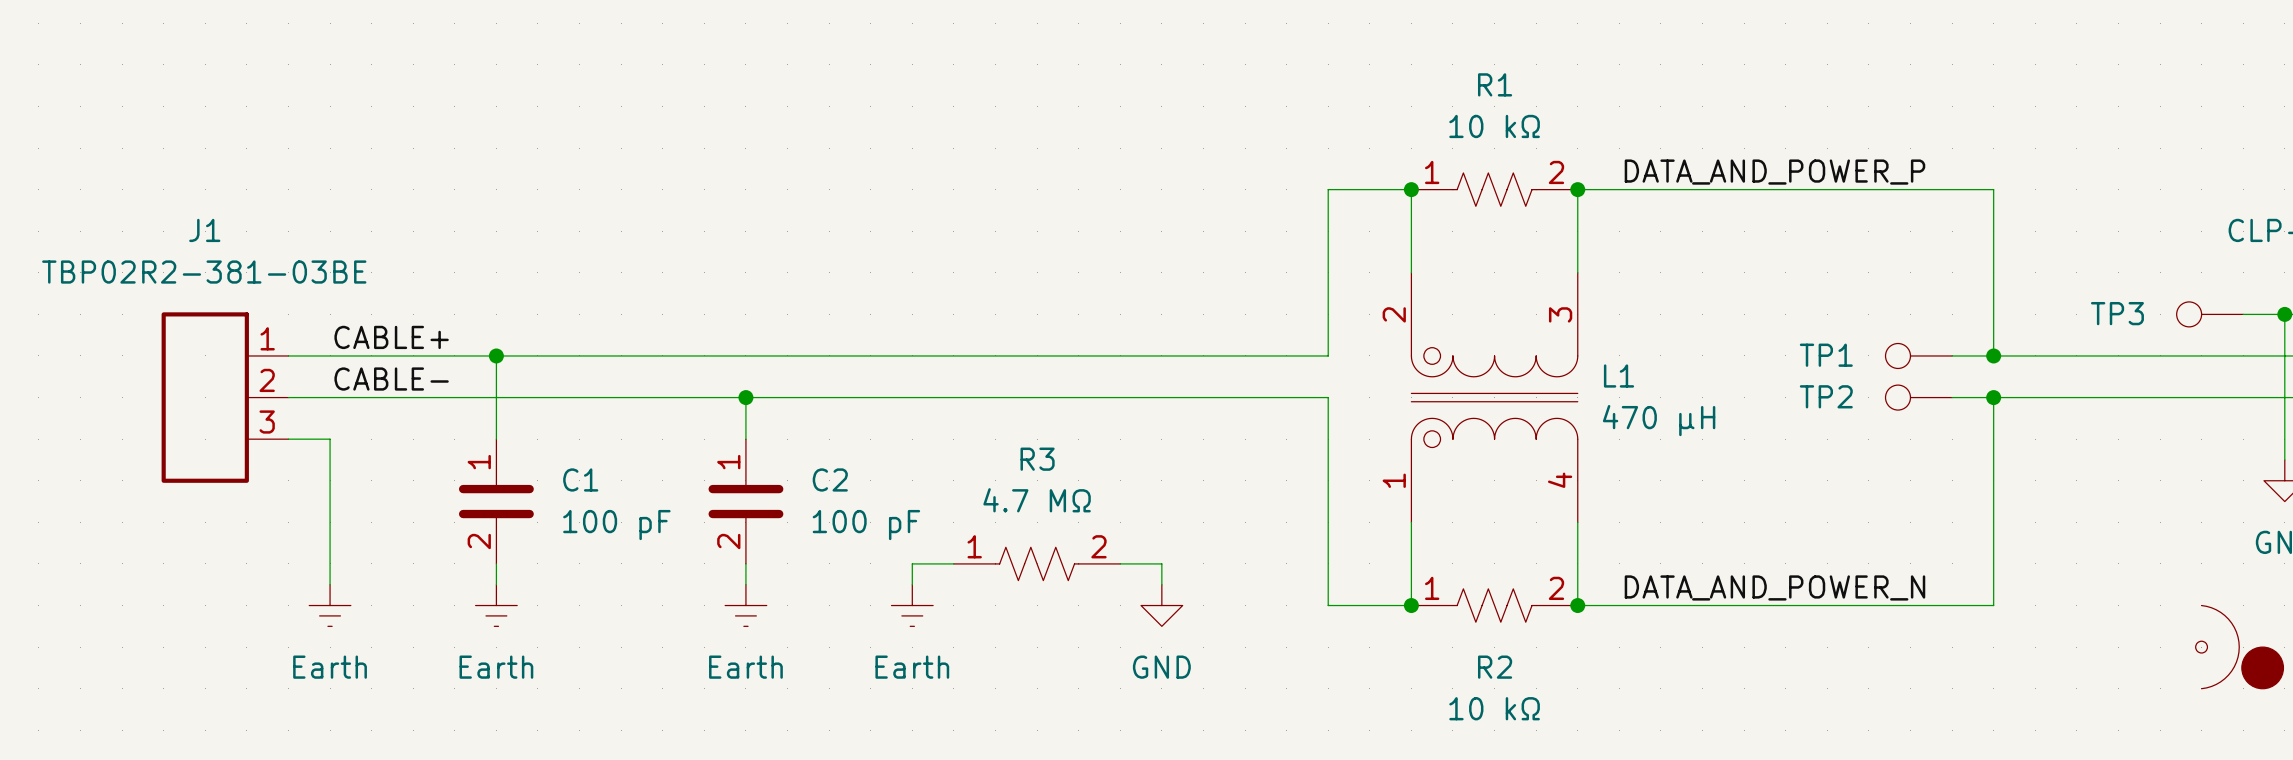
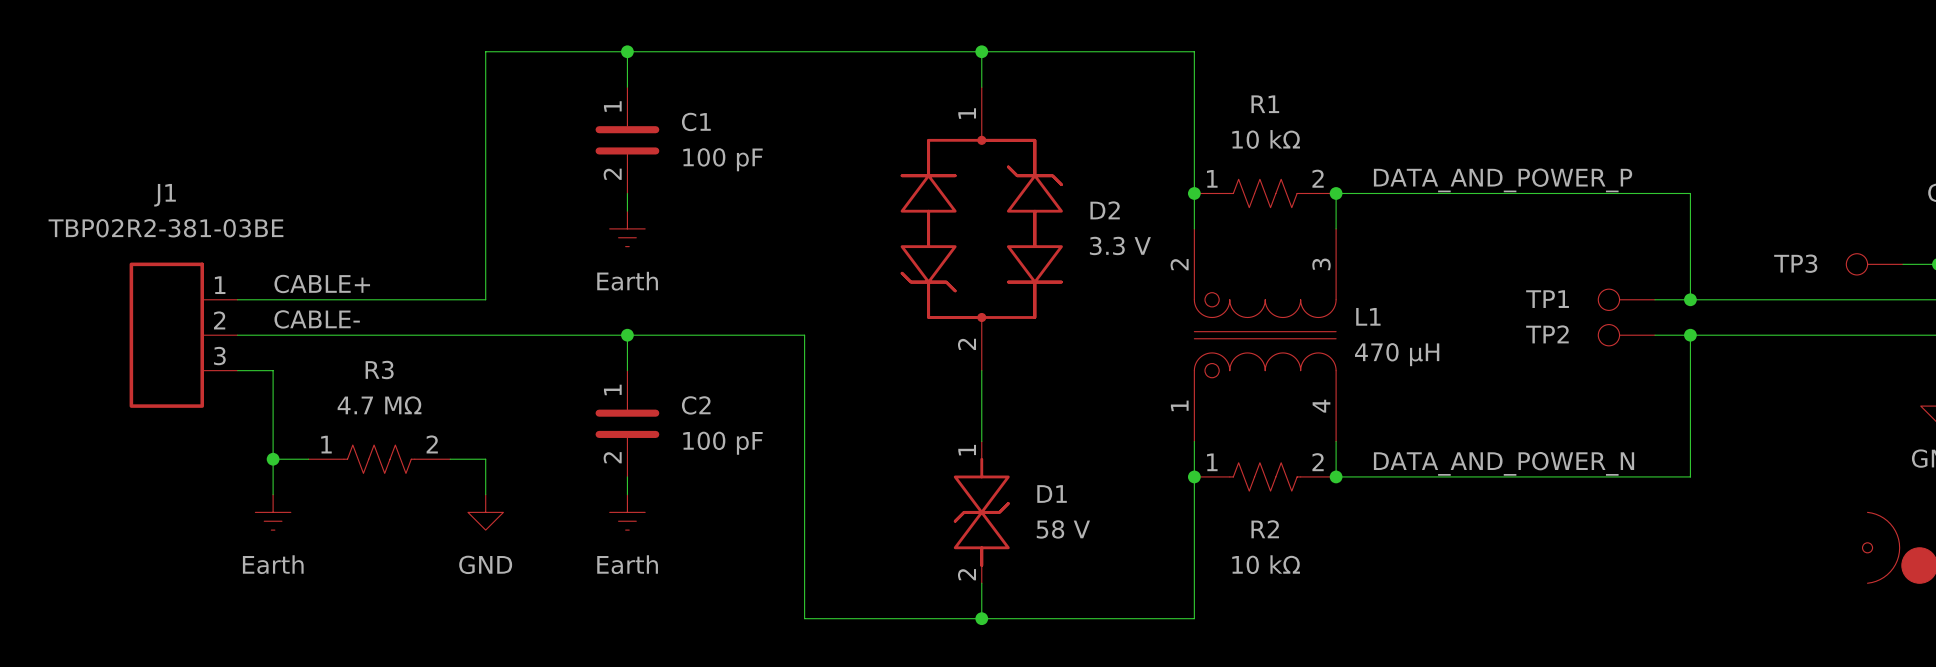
wire: none -> (627, 51) (627, 87)
junction: none -> (627, 51)
wire: none -> (981, 51) (981, 87)
junction: none -> (981, 51)
label position: DATA_AND_POWER_P (1774, 172) -> DATA_AND_POWER_P (1503, 180)
wire: (1411, 189) (1328, 189) (1328, 355) (579, 355) -> (1194, 158) (1194, 51) (485, 51) (485, 299)
junction position: (1411, 189) -> (1194, 193)
R1 position: (1494, 189) -> (1265, 193)
junction position: (1577, 189) -> (1336, 193)
wire: none -> (627, 193) (627, 211)
wire: (1577, 231) (1577, 189) (1993, 189) (1993, 231) -> (1336, 193) (1690, 193)
power symbol: none -> Earth (627, 228)
D2: none -> 3.3 V (981, 228)
wire: (496, 355) (496, 439) -> none
junction: (496, 355) -> none
wire: (953, 397) (1328, 397) (1328, 605) (1411, 605) -> (804, 335) (804, 618) (1194, 618) (1194, 512)
wire: none -> (981, 370) (981, 441)
C1 position: (496, 501) -> (627, 140)
wire: none -> (273, 459) (308, 459)
junction: none -> (273, 459)
wire: none -> (450, 459) (485, 459) (485, 494)
wire: (496, 563) (496, 584) -> none
wire: (953, 563) (912, 563) (912, 584) -> none
R3 position: (1037, 563) -> (379, 459)
wire: (1120, 563) (1161, 563) (1161, 584) -> none
wire: (1577, 563) (1577, 605) (1993, 605) (1993, 563) -> (1336, 476) (1690, 476)
label position: DATA_AND_POWER_N (1774, 587) -> DATA_AND_POWER_N (1504, 463)
power symbol: Earth (496, 605) -> none
power symbol: none -> GND (485, 512)
power symbol: Earth (912, 605) -> none
D1: none -> 58 V (981, 512)
power symbol: GND (1161, 605) -> none
junction position: (1411, 605) -> (1194, 476)
R2 position: (1494, 605) -> (1265, 476)
junction position: (1577, 605) -> (1336, 476)
wire: none -> (981, 583) (981, 618)
junction: none -> (981, 618)

